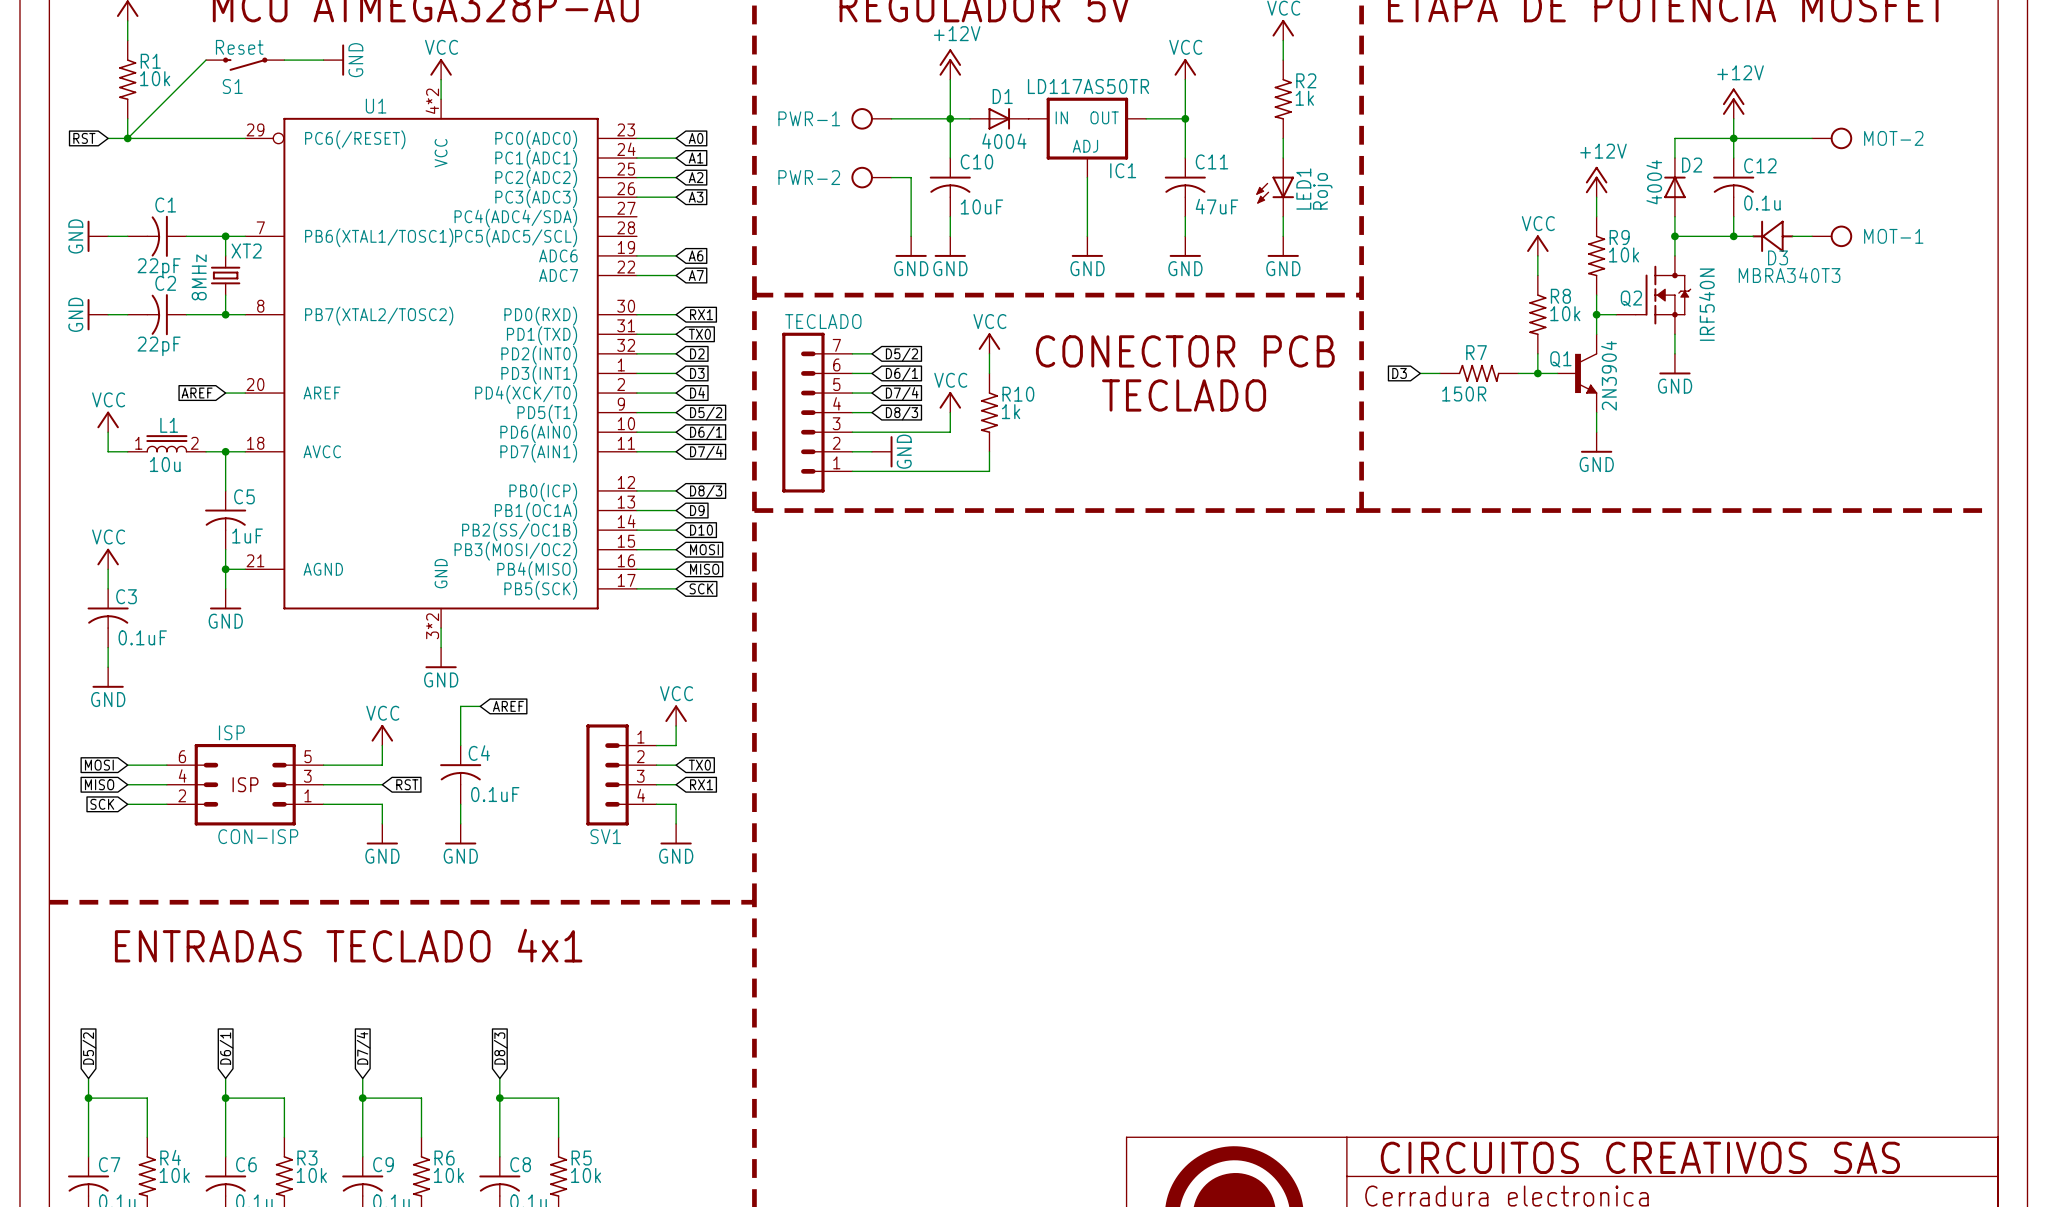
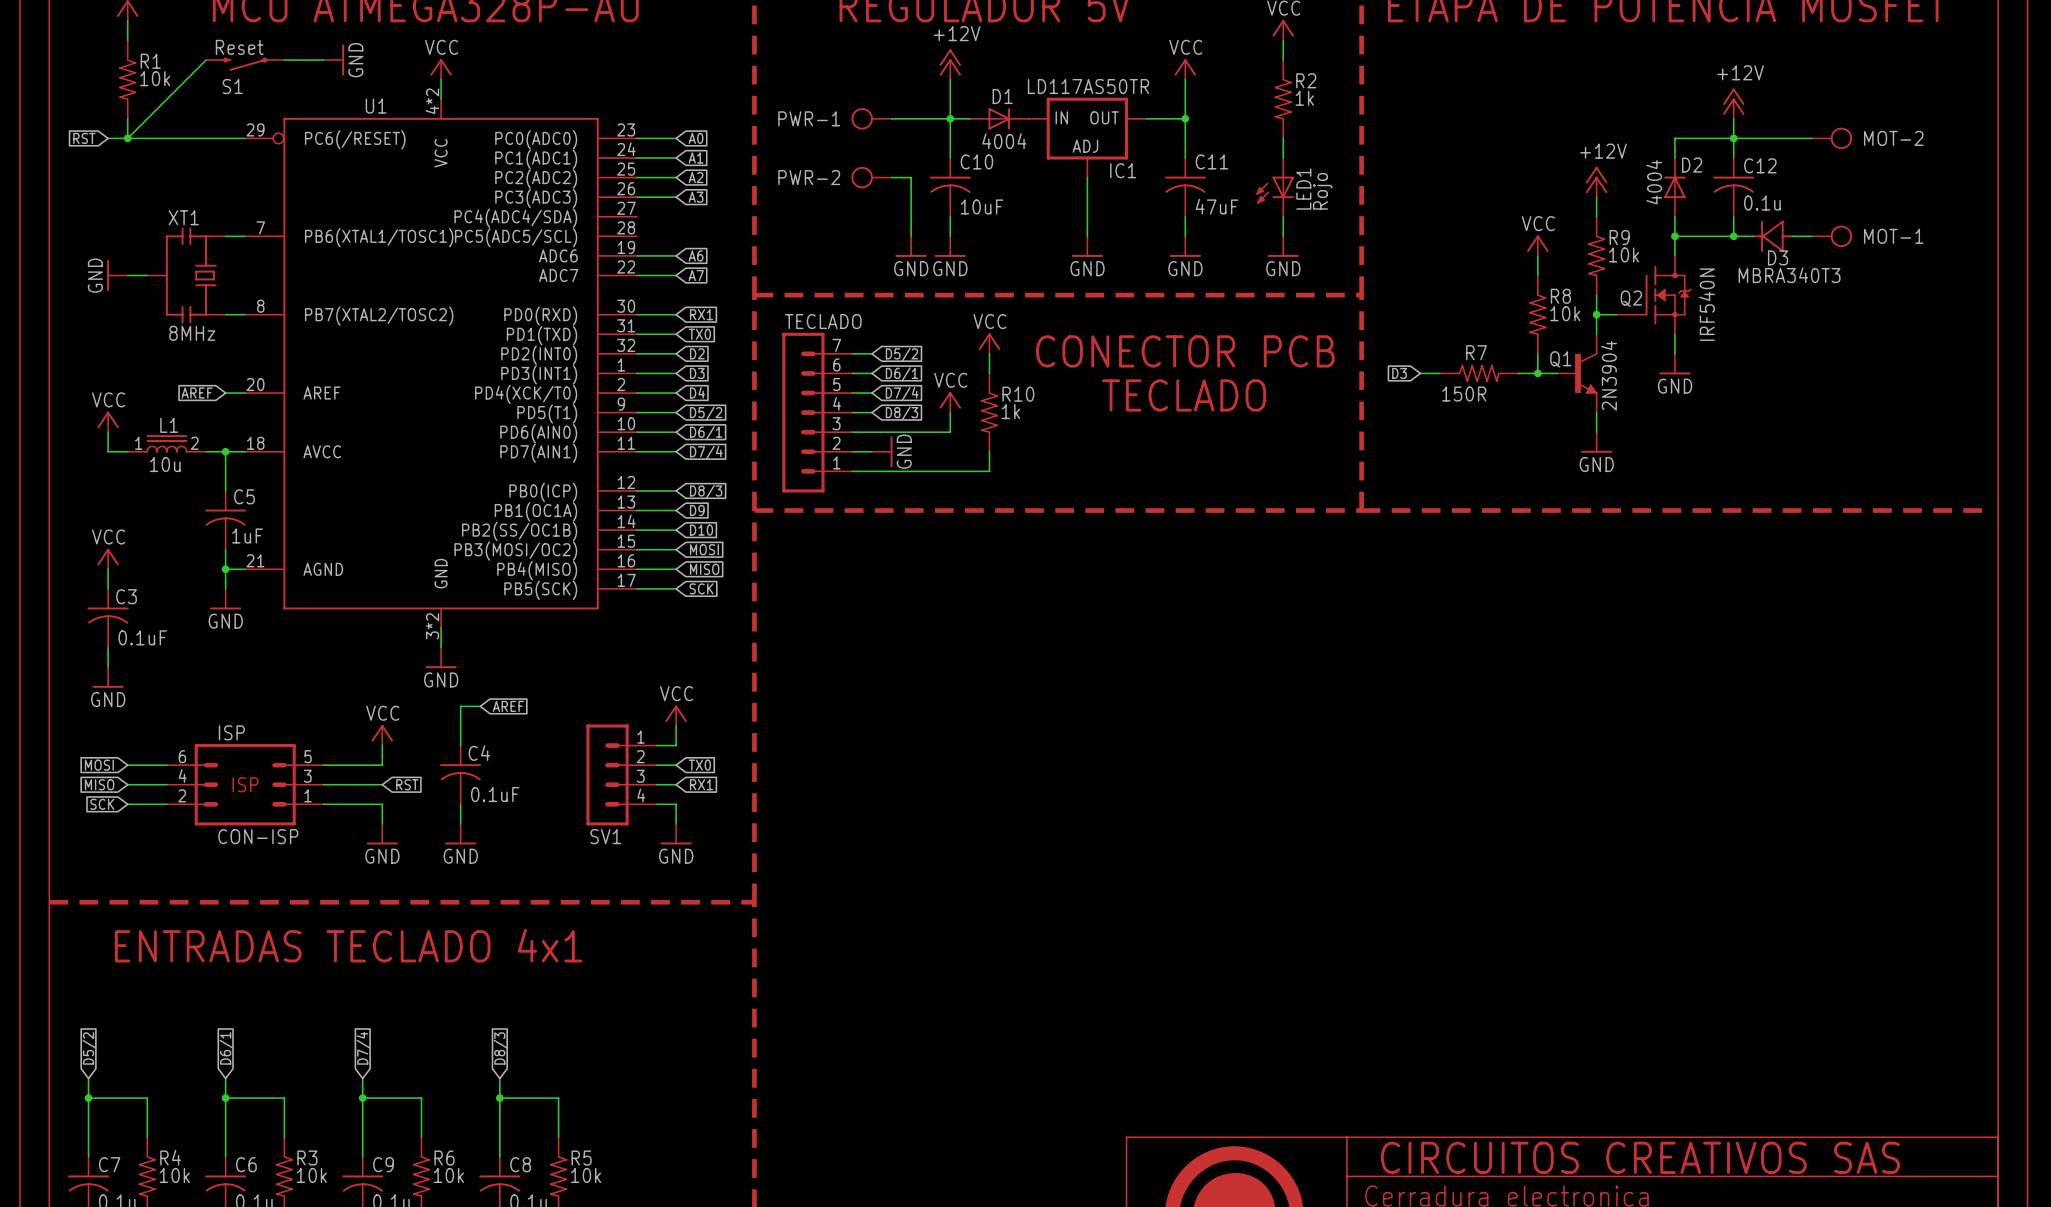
power symbol: GND (97, 236) -> none
wire: (108, 236) (127, 236) -> (127, 275) (147, 275)
C1: 22pF (157, 236) -> none
wire: (186, 236) (225, 236) (225, 255) -> none
junction: (225, 236) -> none
power symbol: none -> GND (117, 275)
XT1: none -> 8MHz (186, 275)
XT2: 8MHz (225, 275) -> none
wire: (225, 295) (225, 314) (186, 314) -> none
power symbol: GND (97, 314) -> none
wire: (108, 314) (127, 314) -> none
C2: 22pF (157, 314) -> none
junction: (225, 314) -> none

